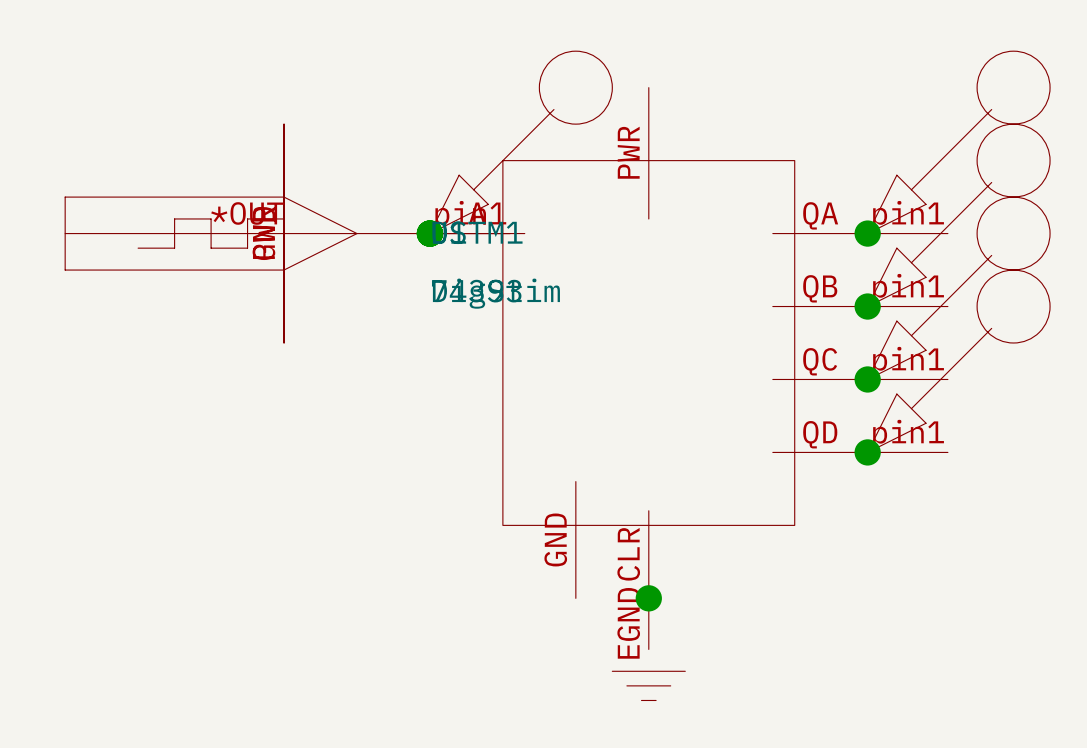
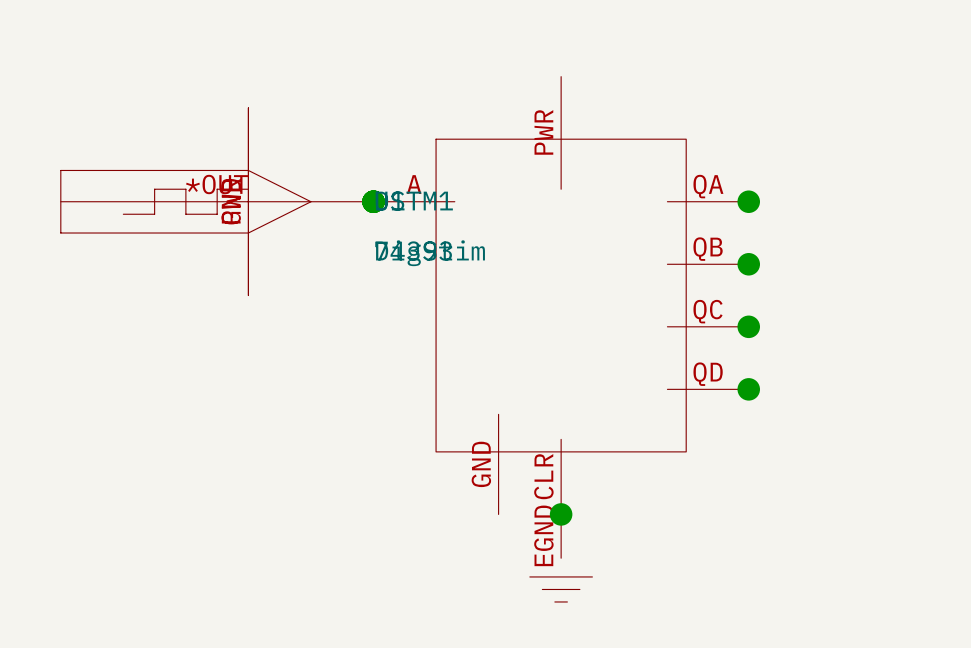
part: (521, 142) -> none
part: (958, 142) -> none
part: (958, 215) -> none
part: (958, 288) -> none
part: (958, 361) -> none

